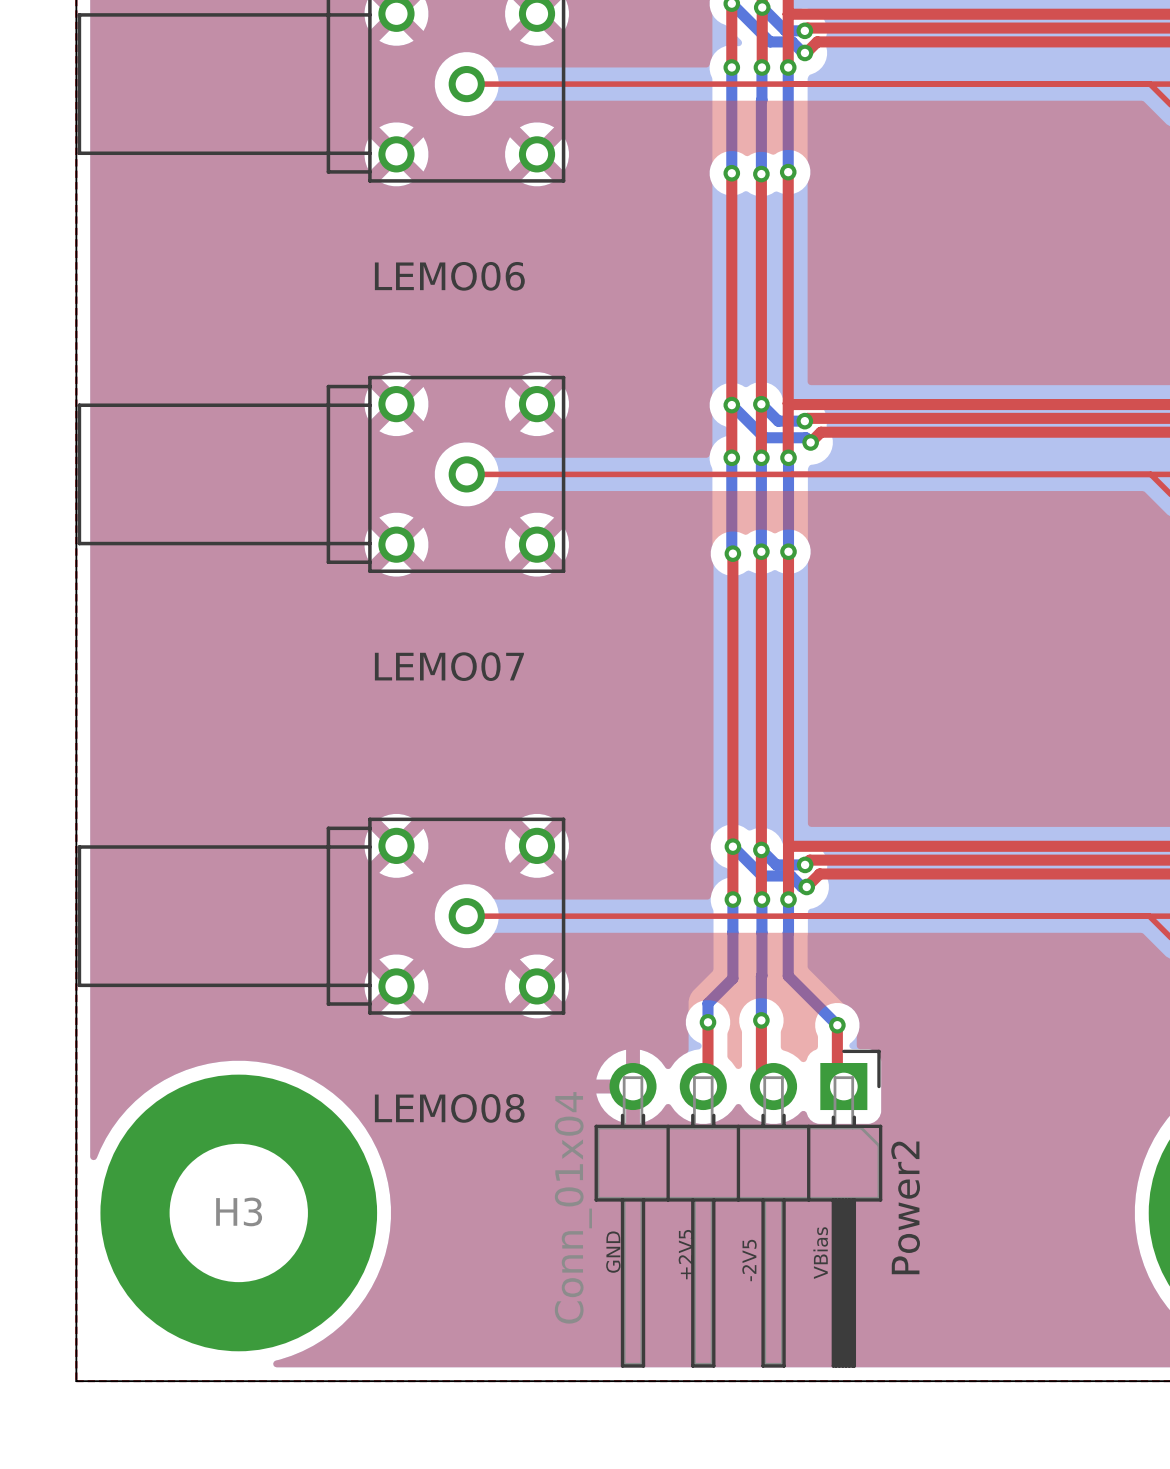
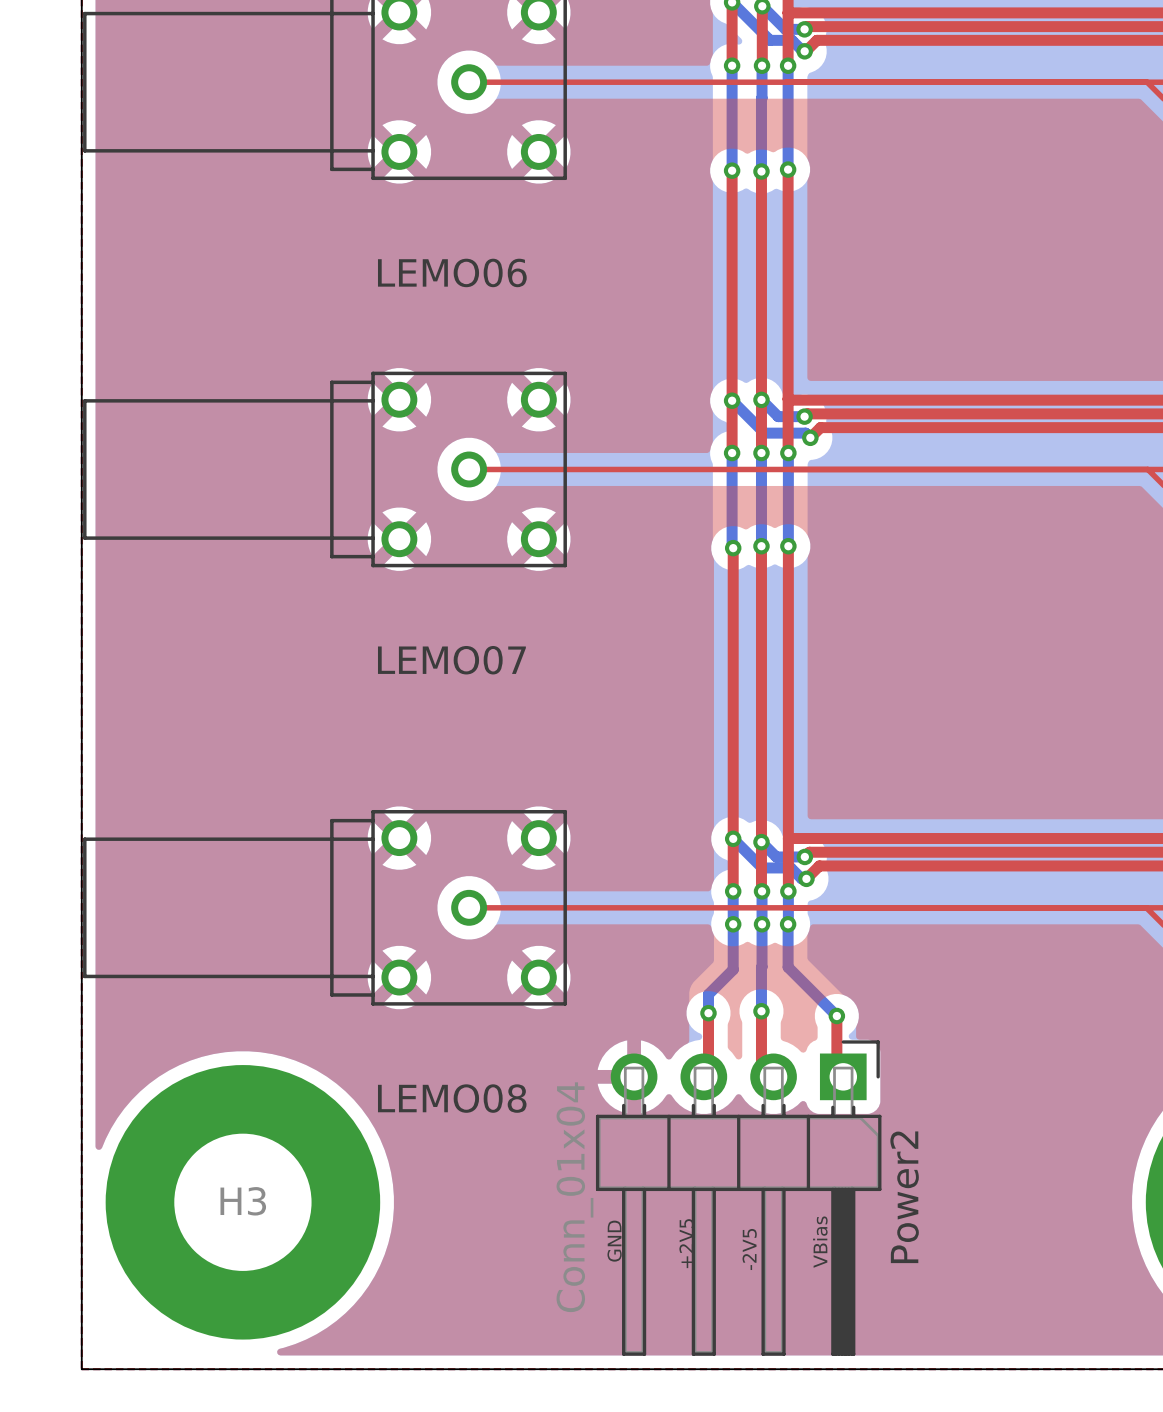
via: none -> (733, 924)
via: none -> (762, 924)
via: none -> (788, 924)

